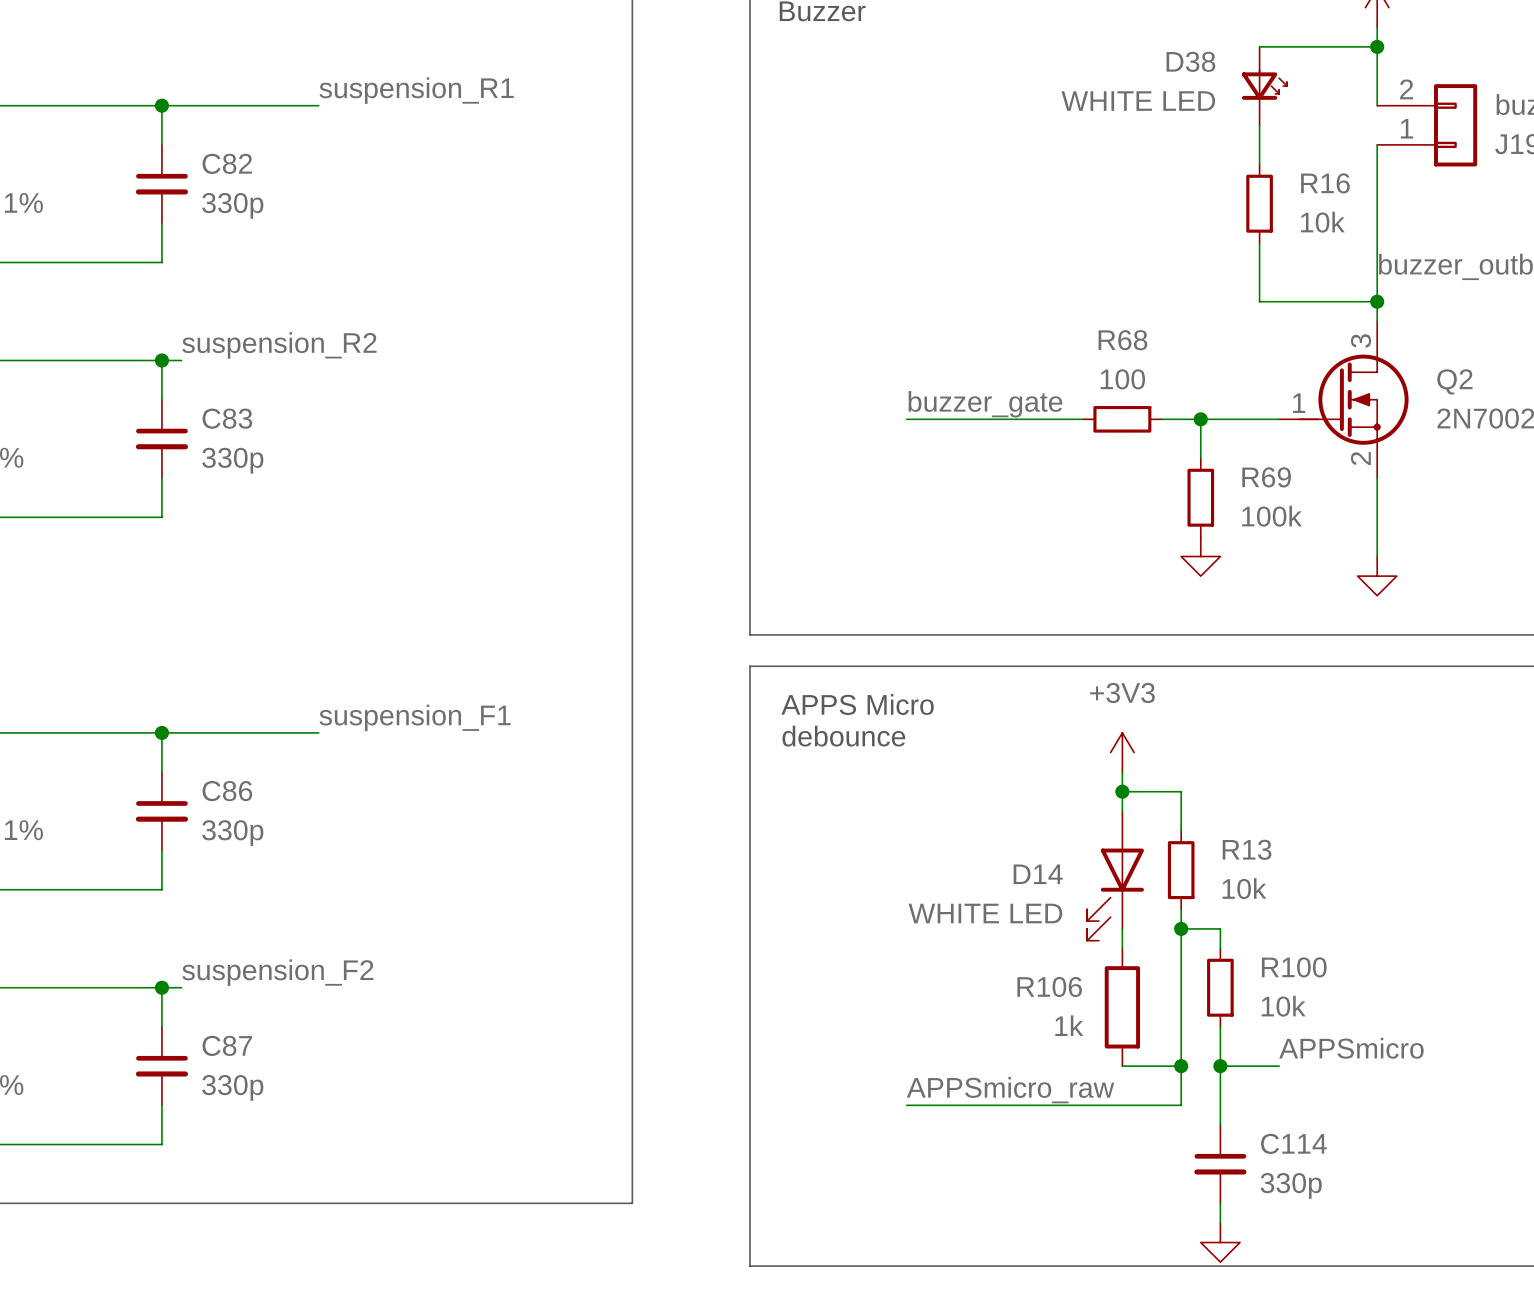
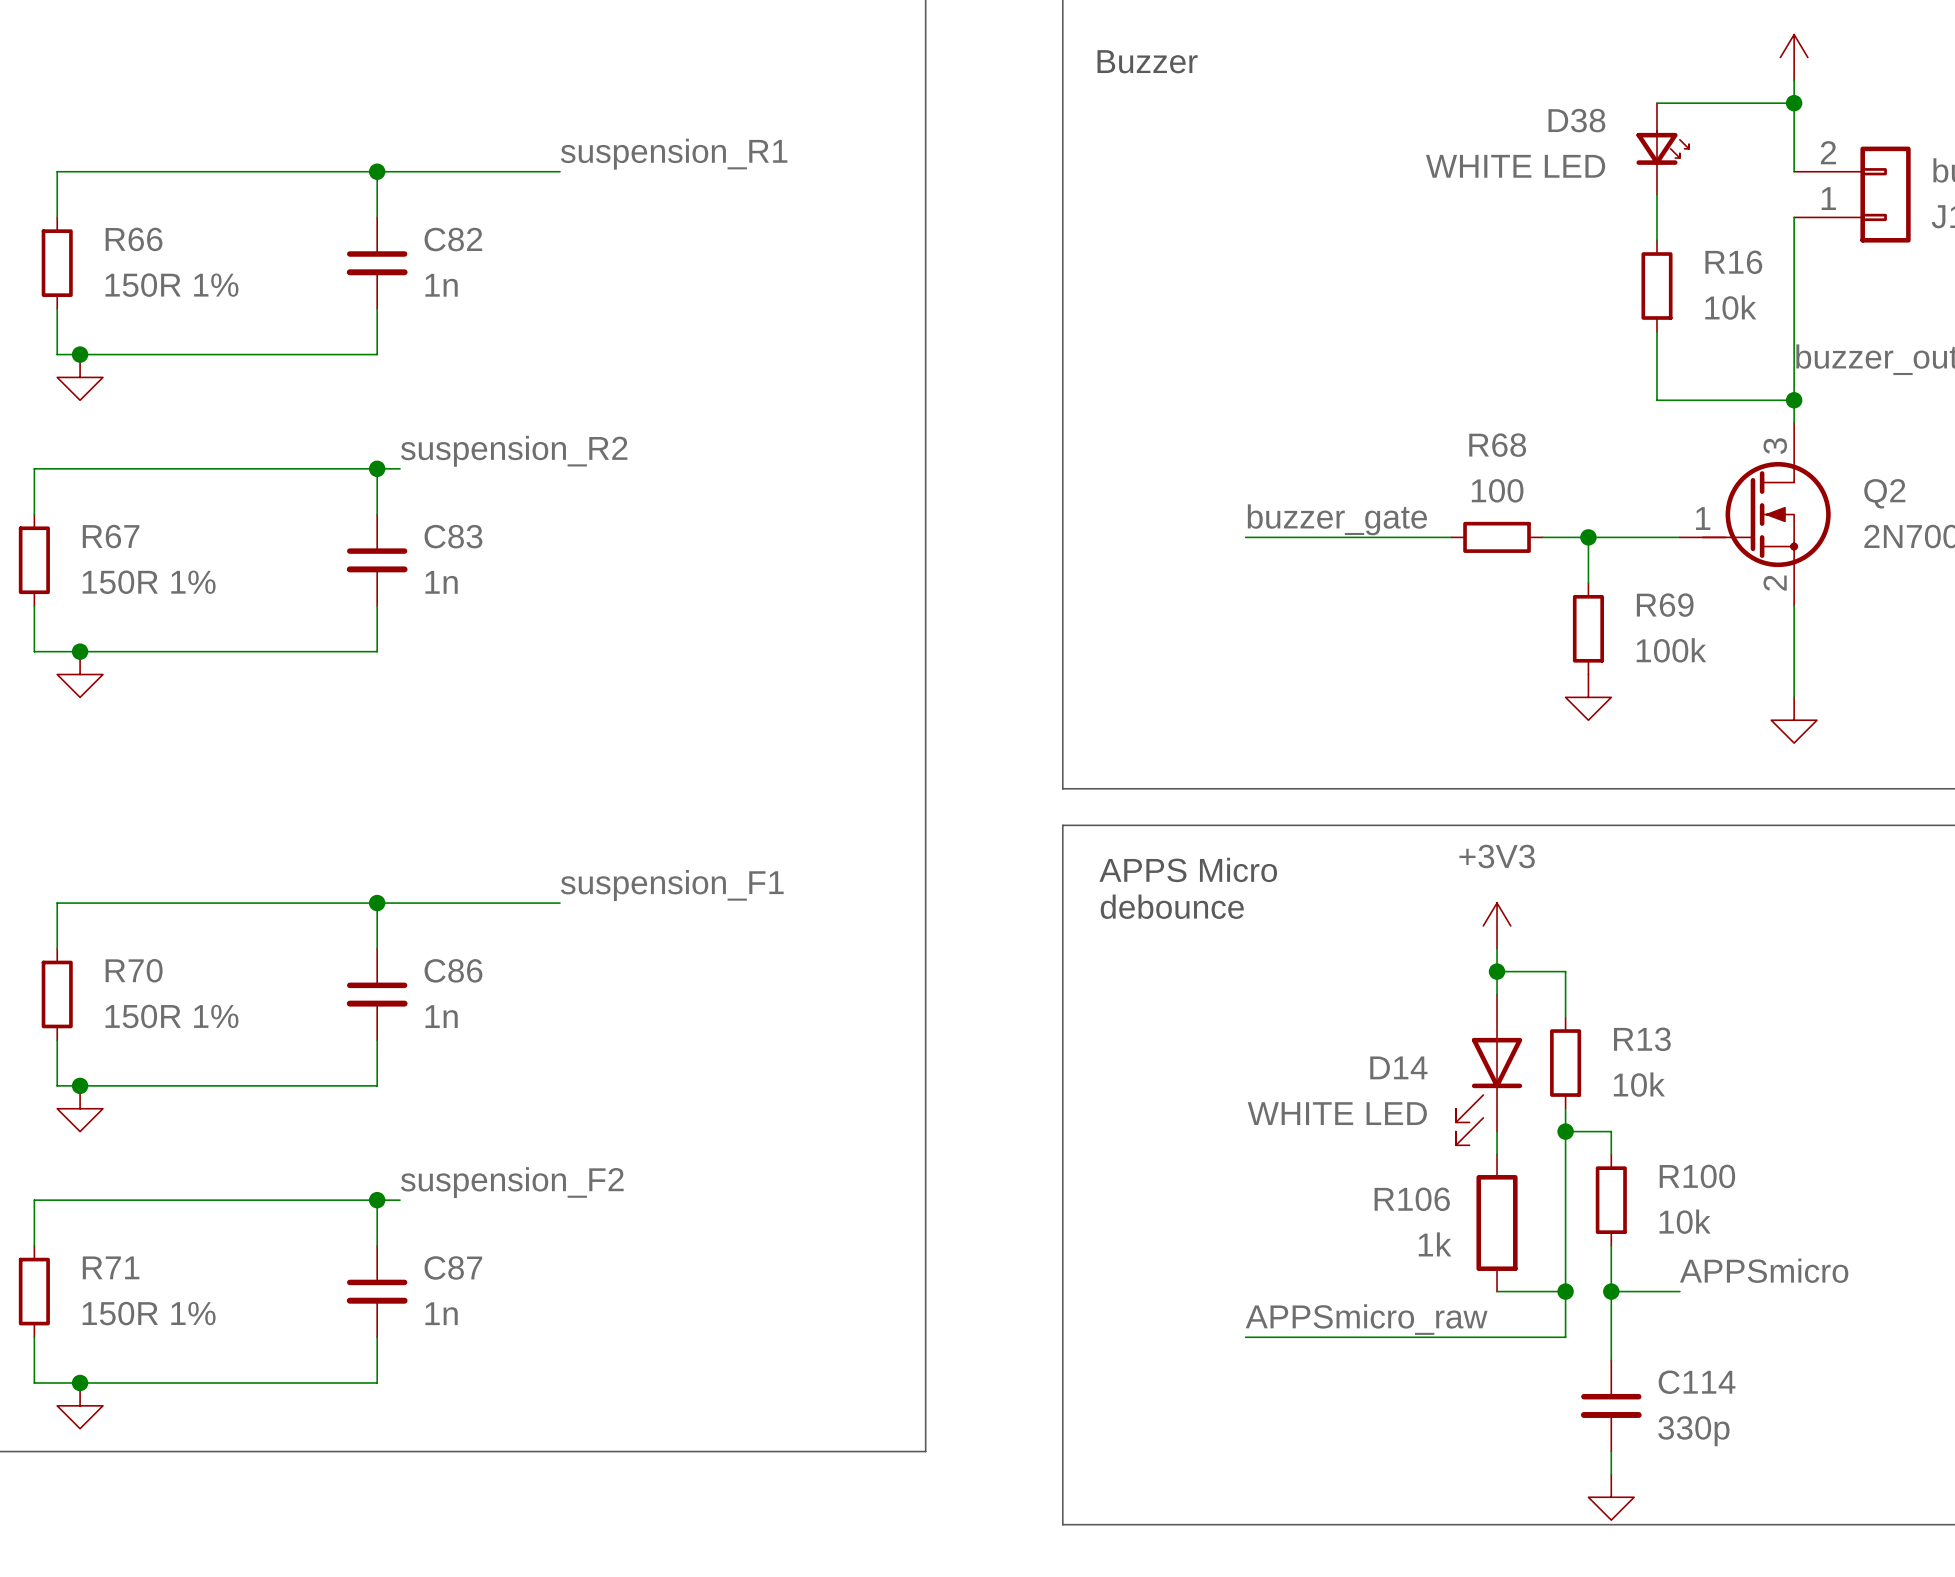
C82 value: 330p (232, 205) -> 1n (441, 285)
C83 value: 330p (232, 460) -> 1n (441, 582)
C86 value: 330p (232, 833) -> 1n (441, 1016)
C87 value: 330p (232, 1087) -> 1n (441, 1313)

